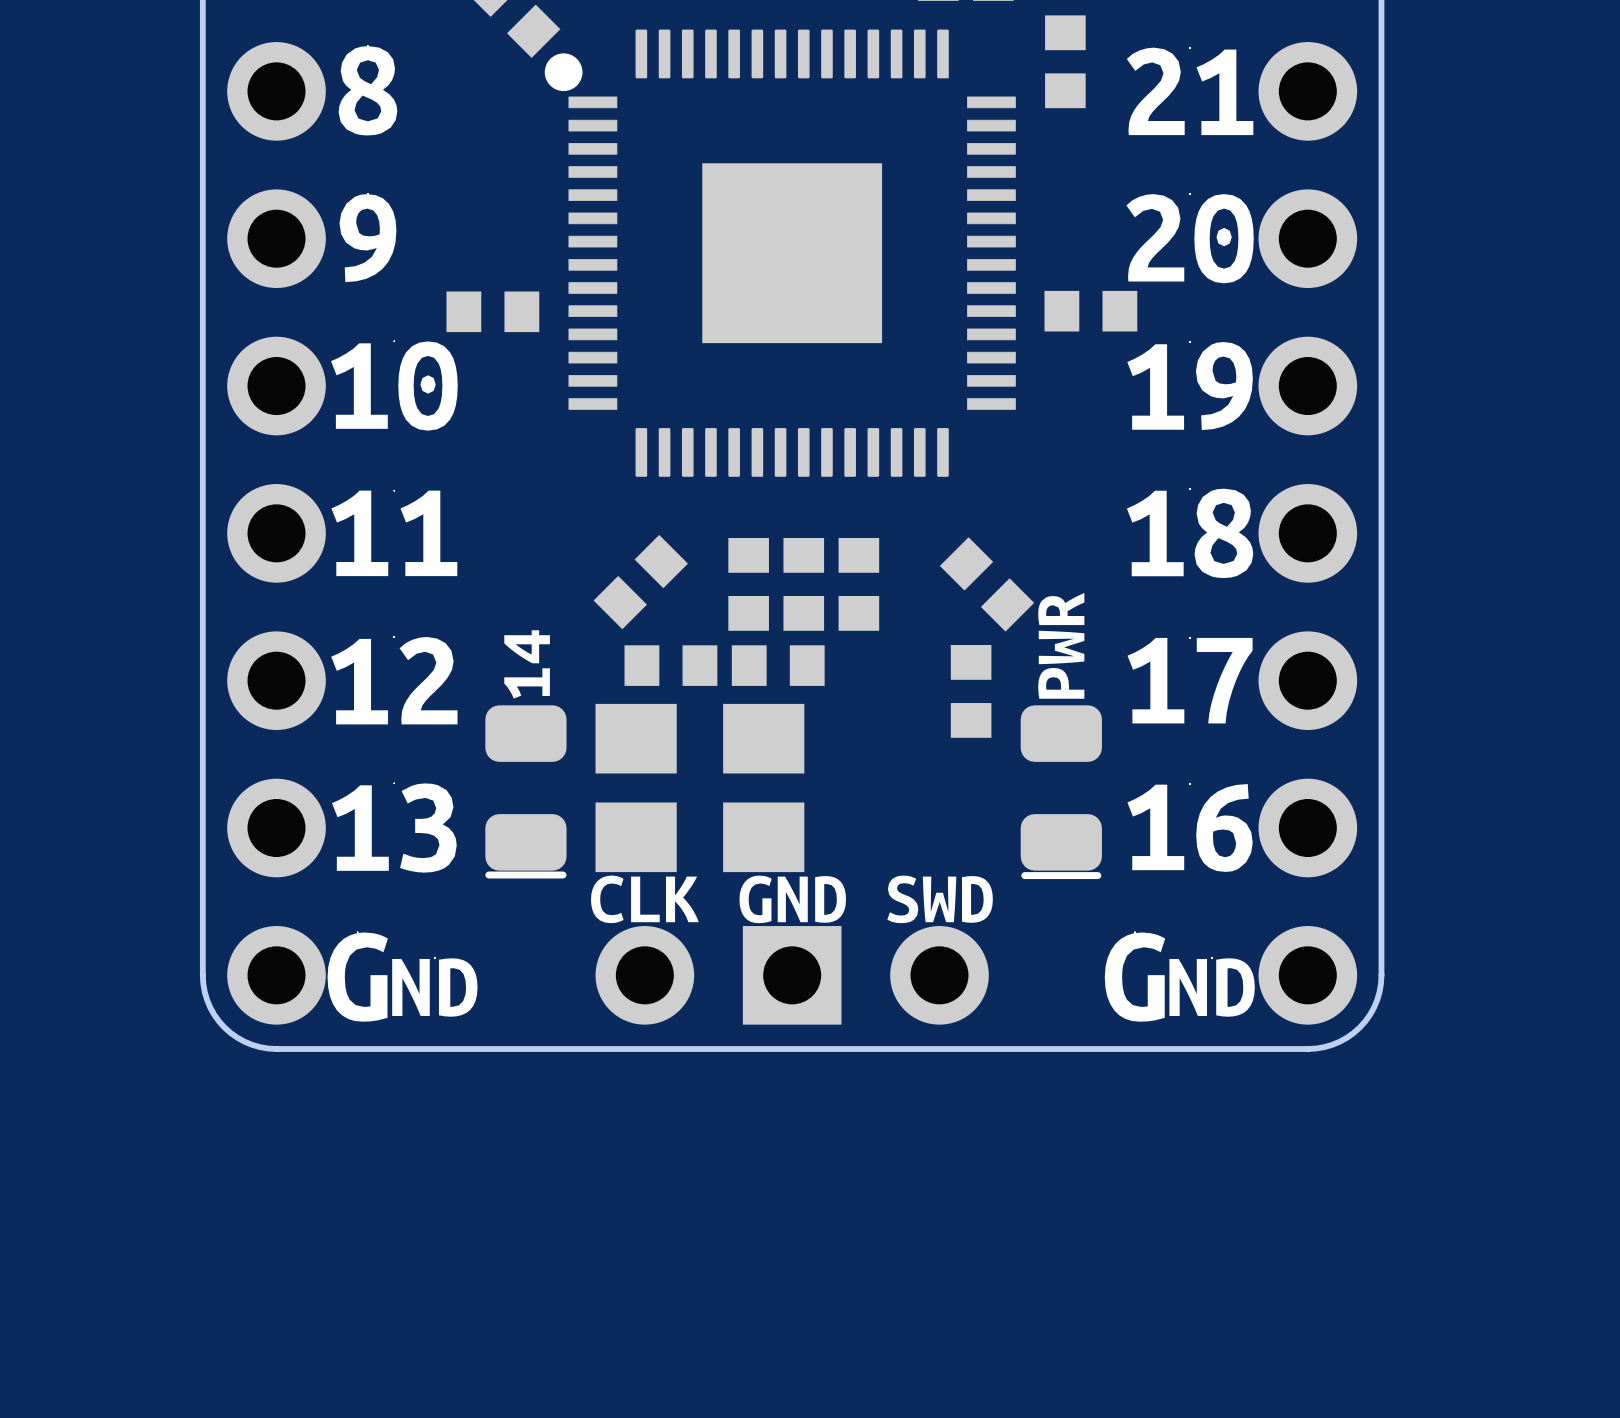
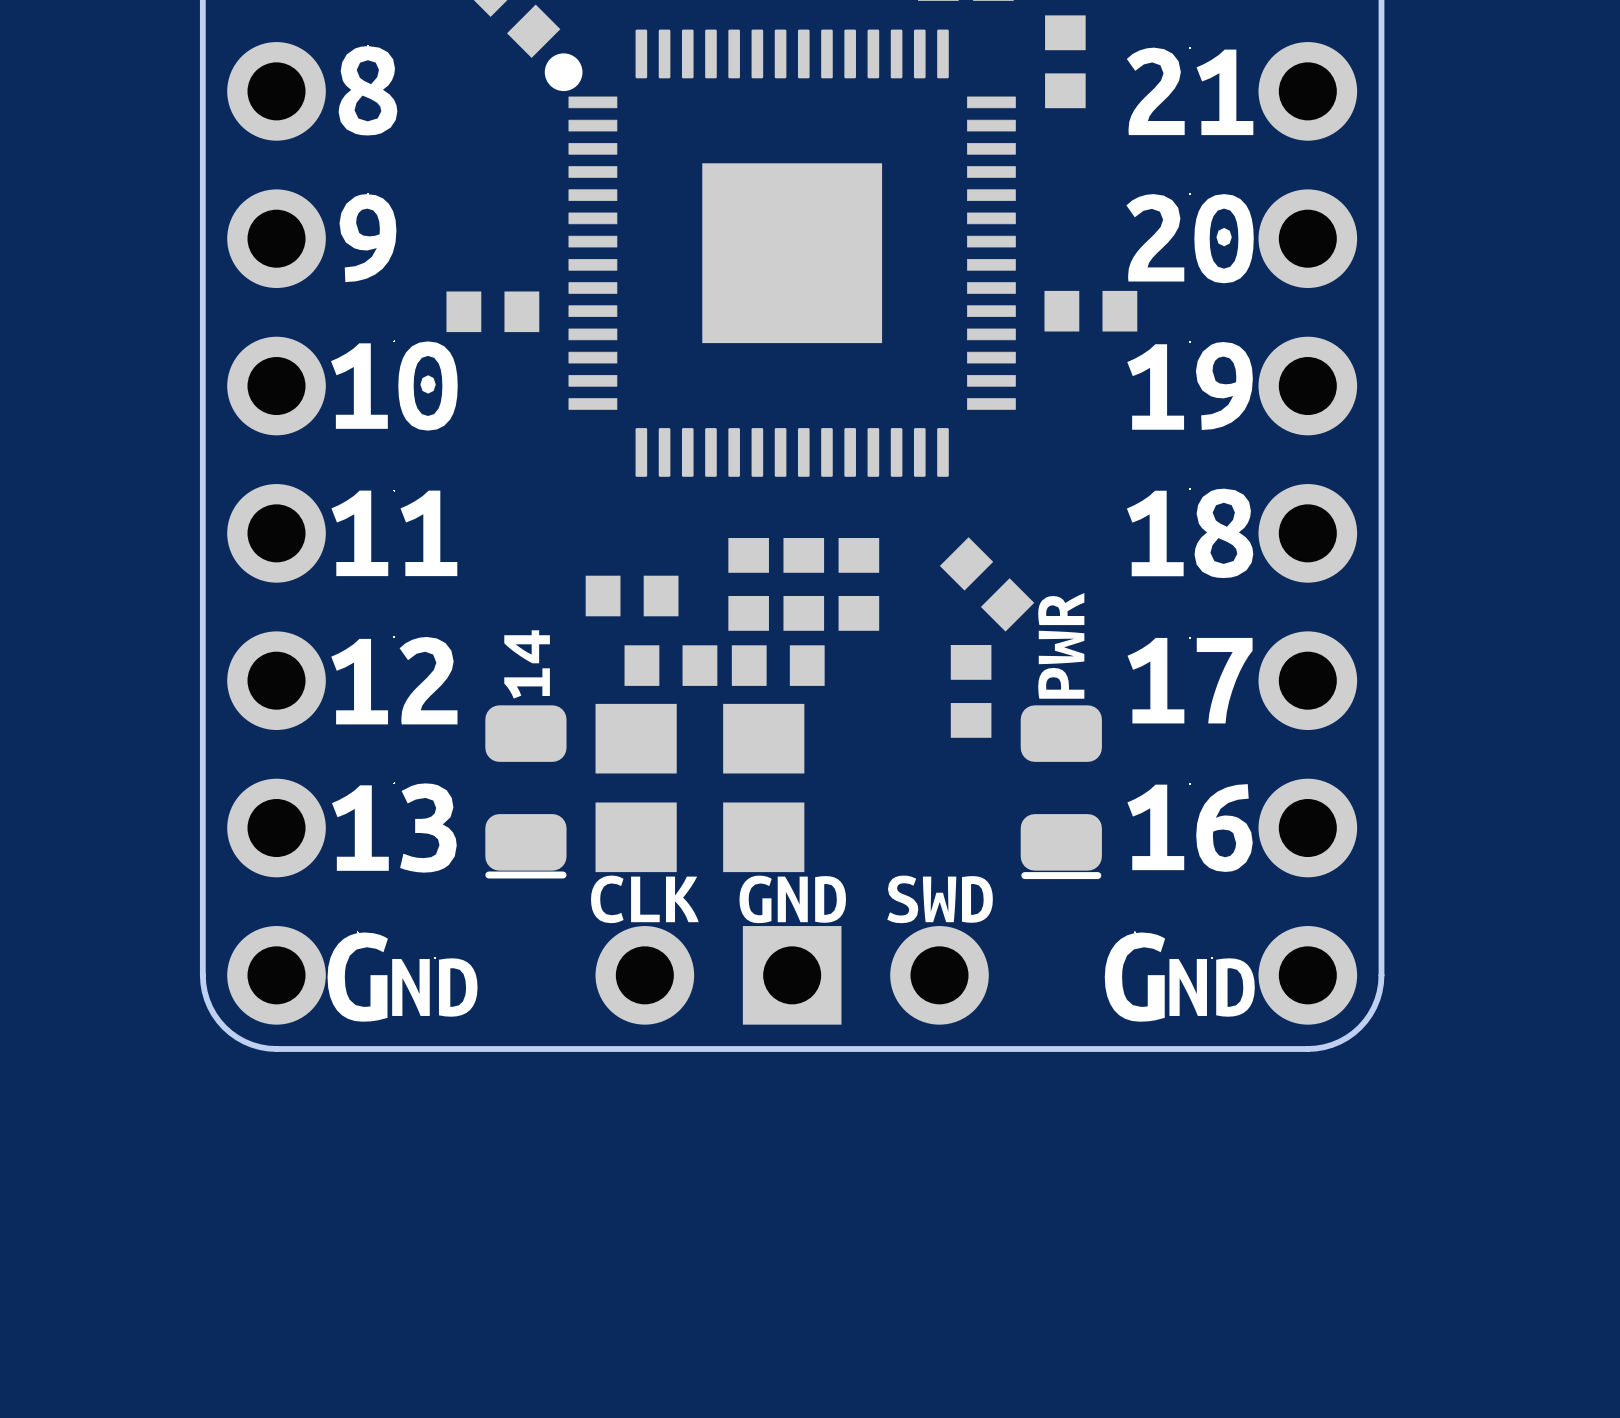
part rotation: 0° (640, 582) -> 45° clockwise (632, 596)

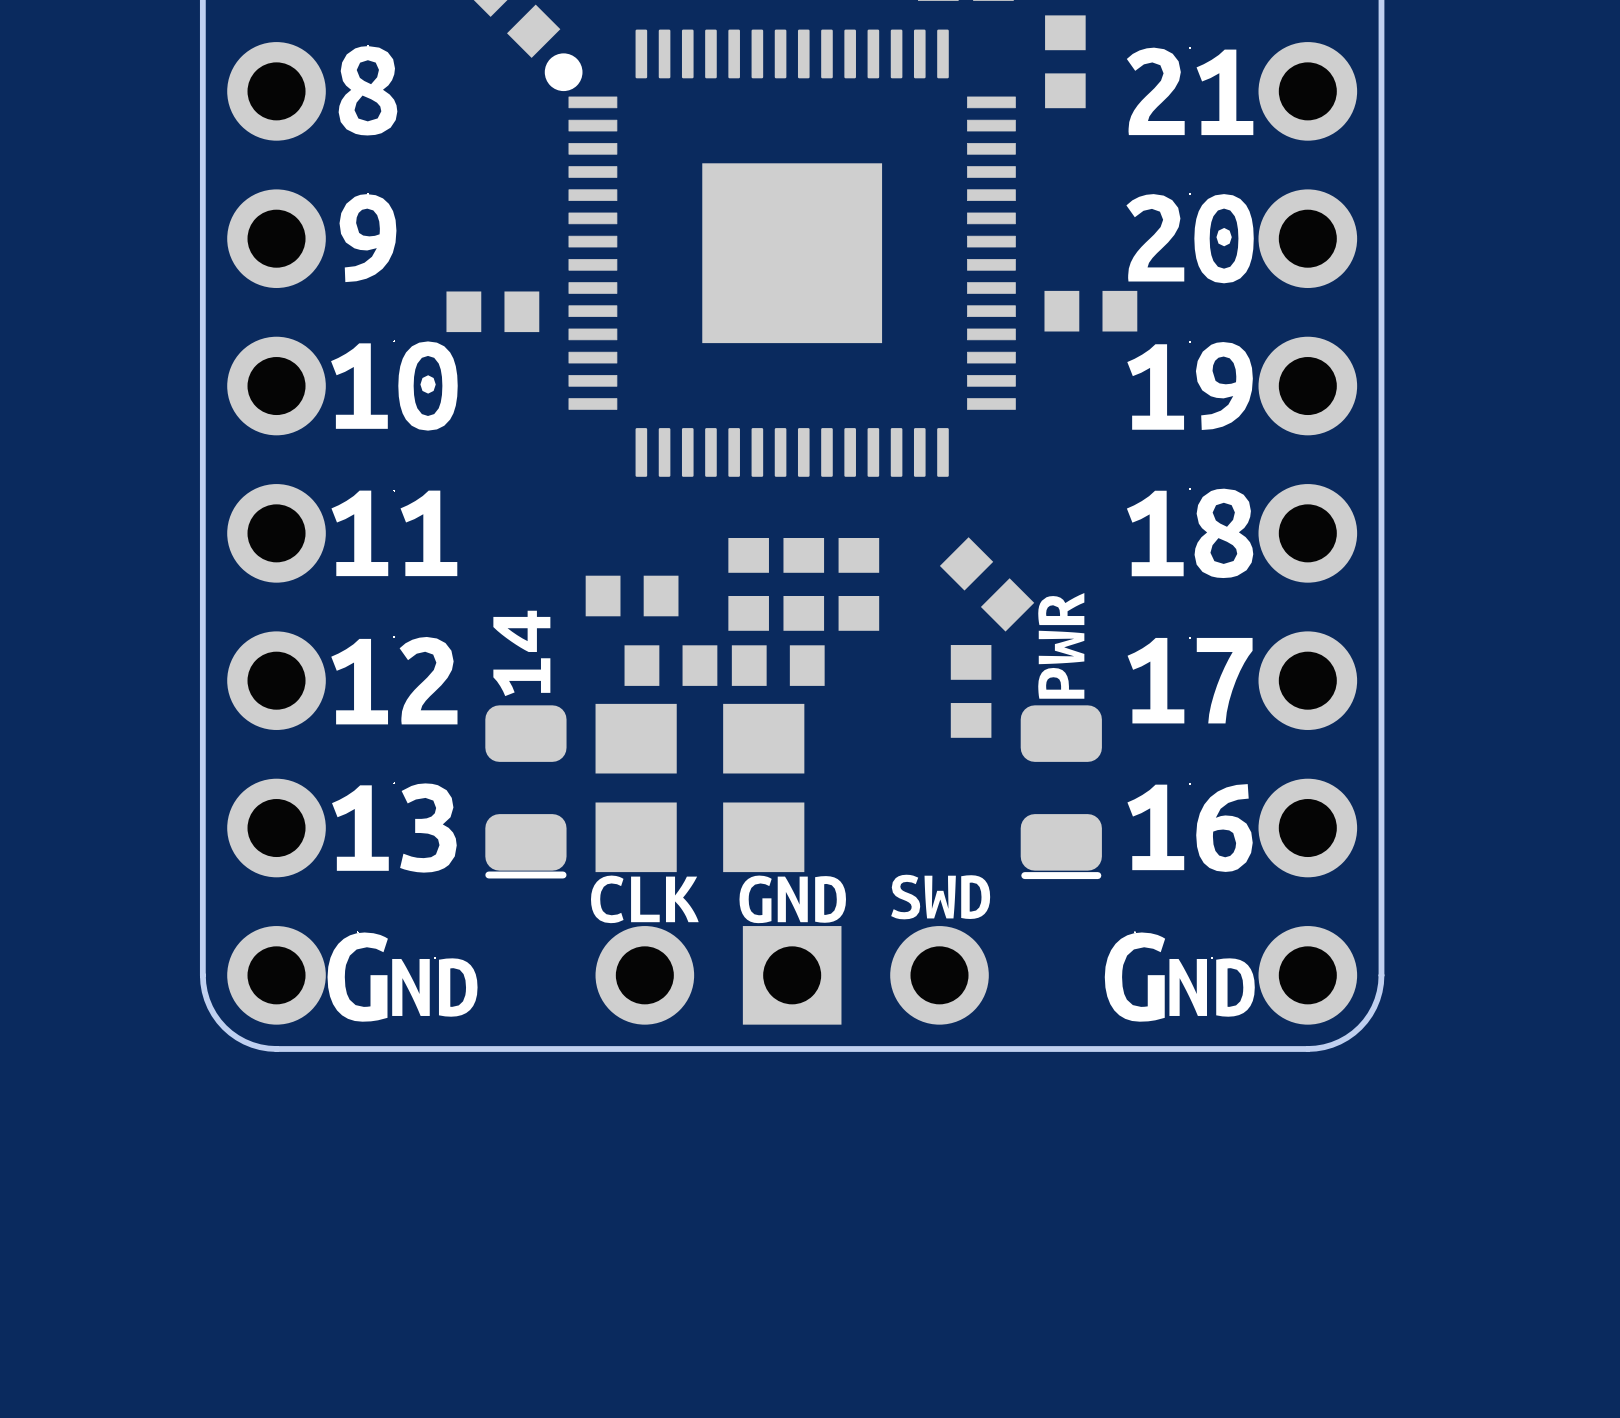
drawing shape: [504, 630, 550, 699] -> [493, 610, 551, 697]
drawing shape: [887, 875, 993, 924] -> [891, 874, 991, 920]

